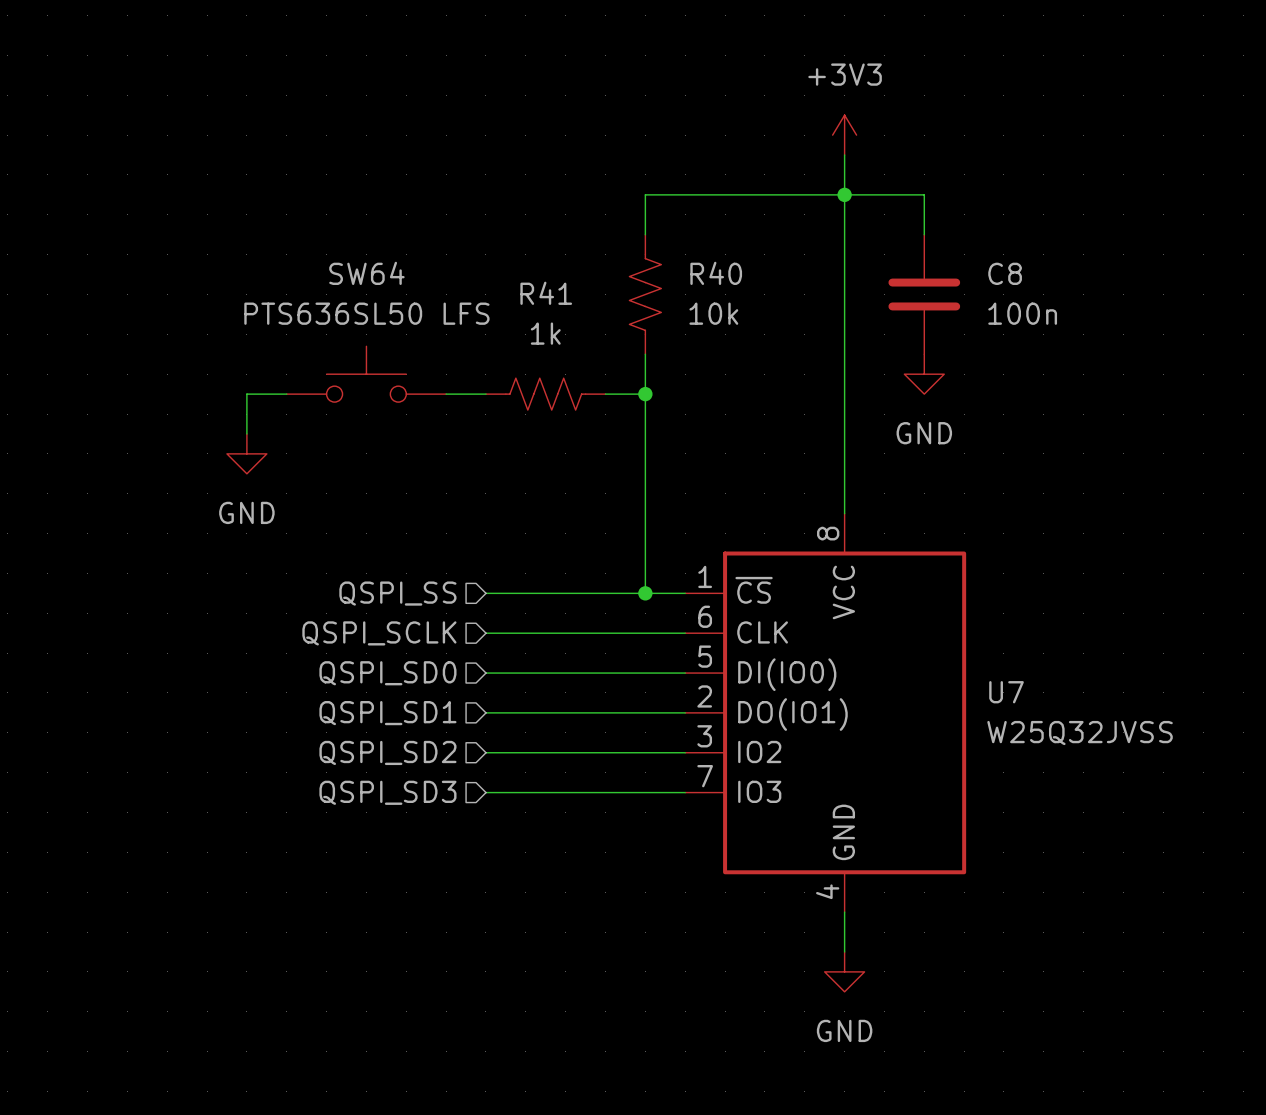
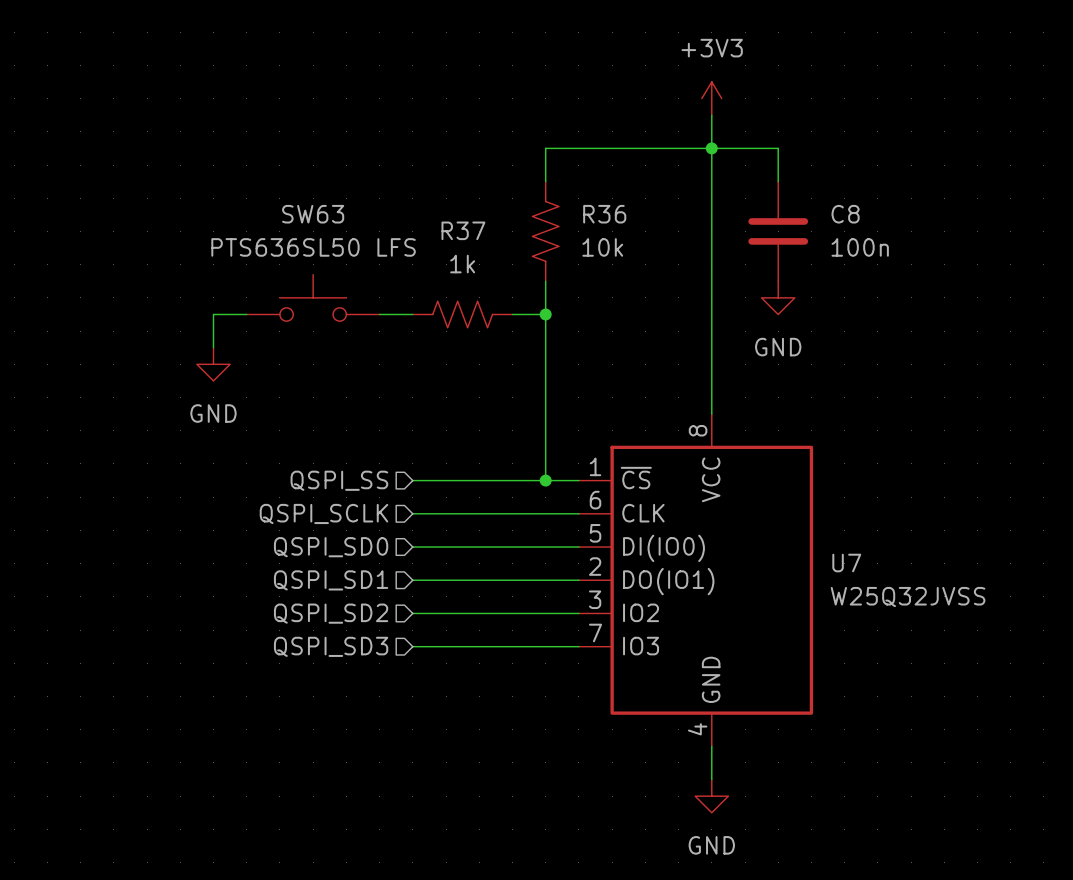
SW64 name: SW64 (366, 273) -> SW63 (313, 214)
R40 name: R40 (716, 273) -> R36 (604, 214)
R41 name: R41 (546, 293) -> R37 (463, 230)

